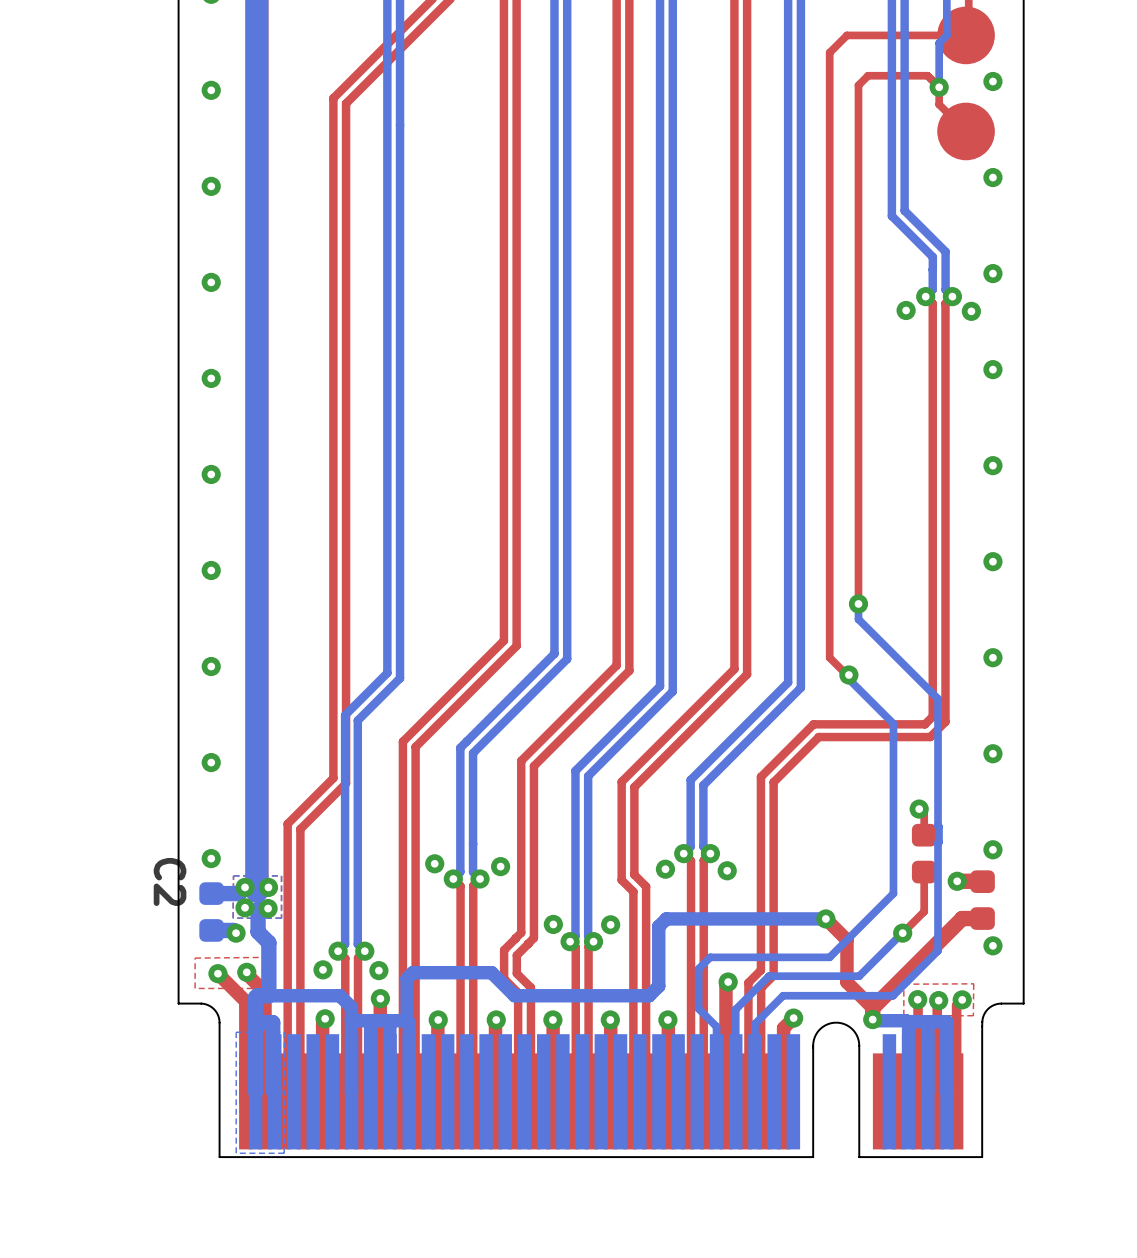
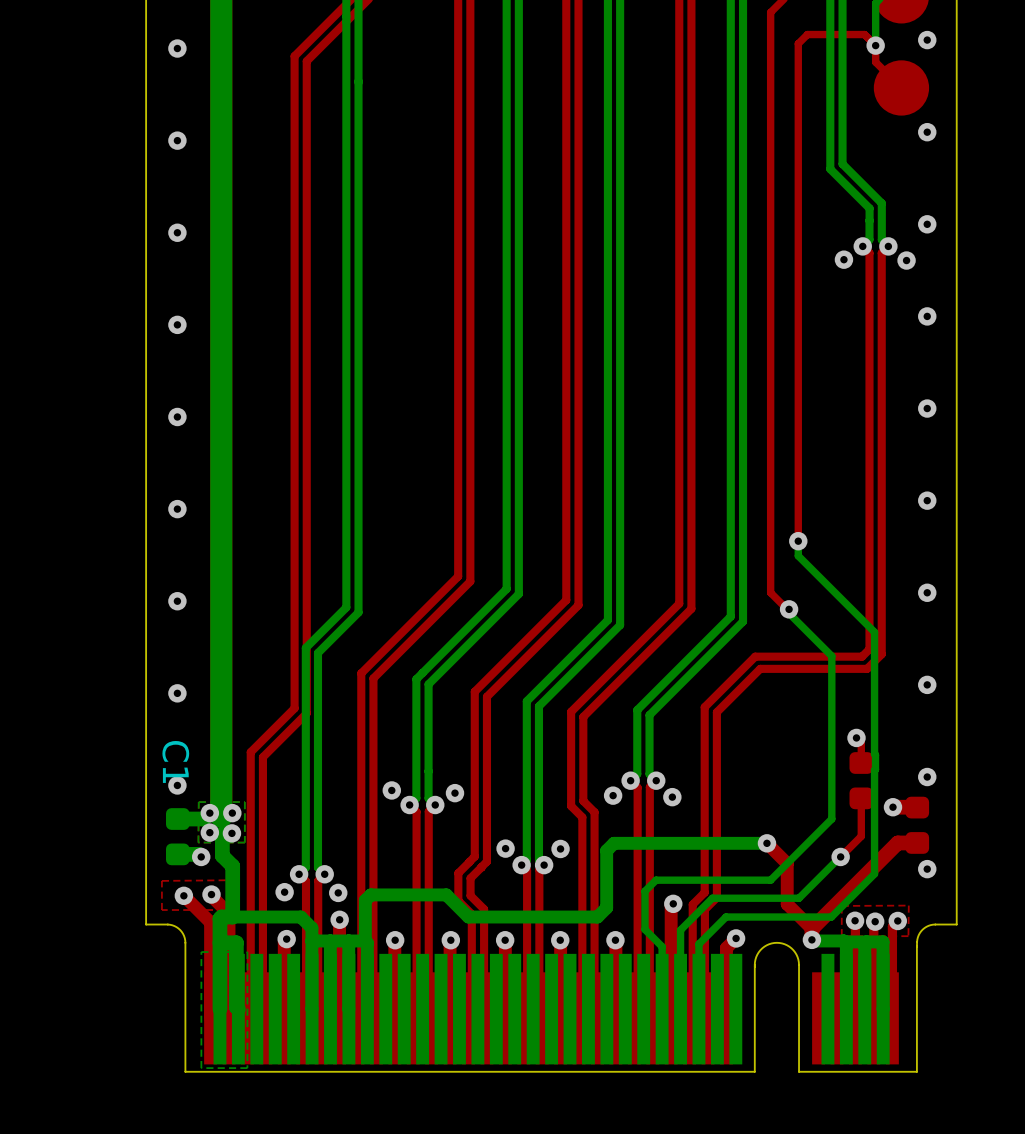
C2 name: C2 (170, 881) -> C1 (175, 761)

